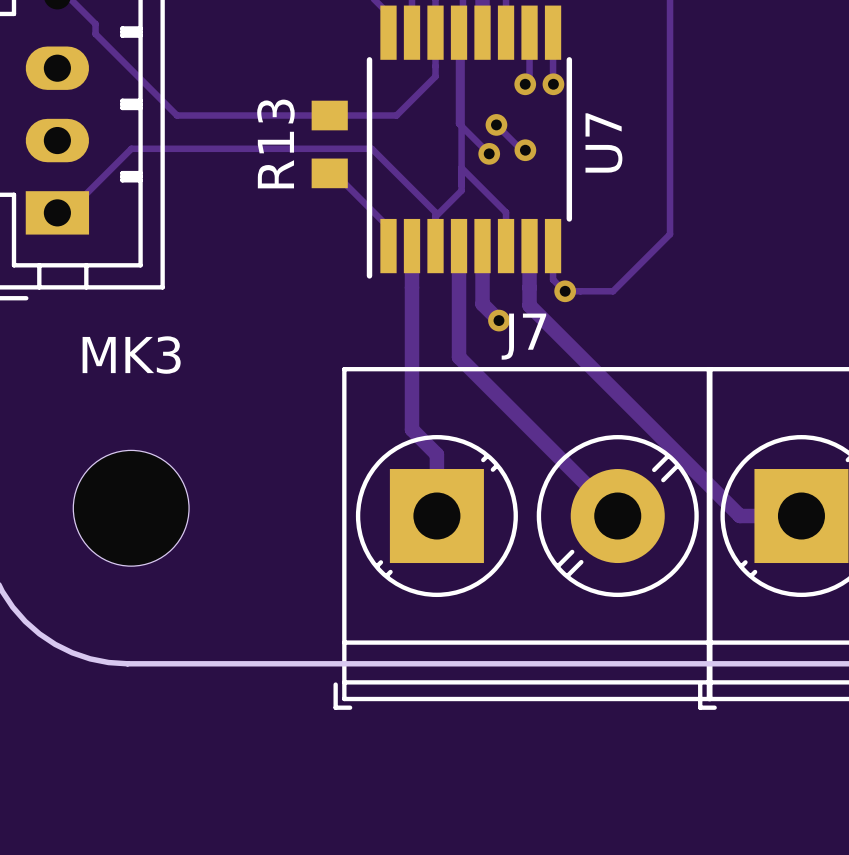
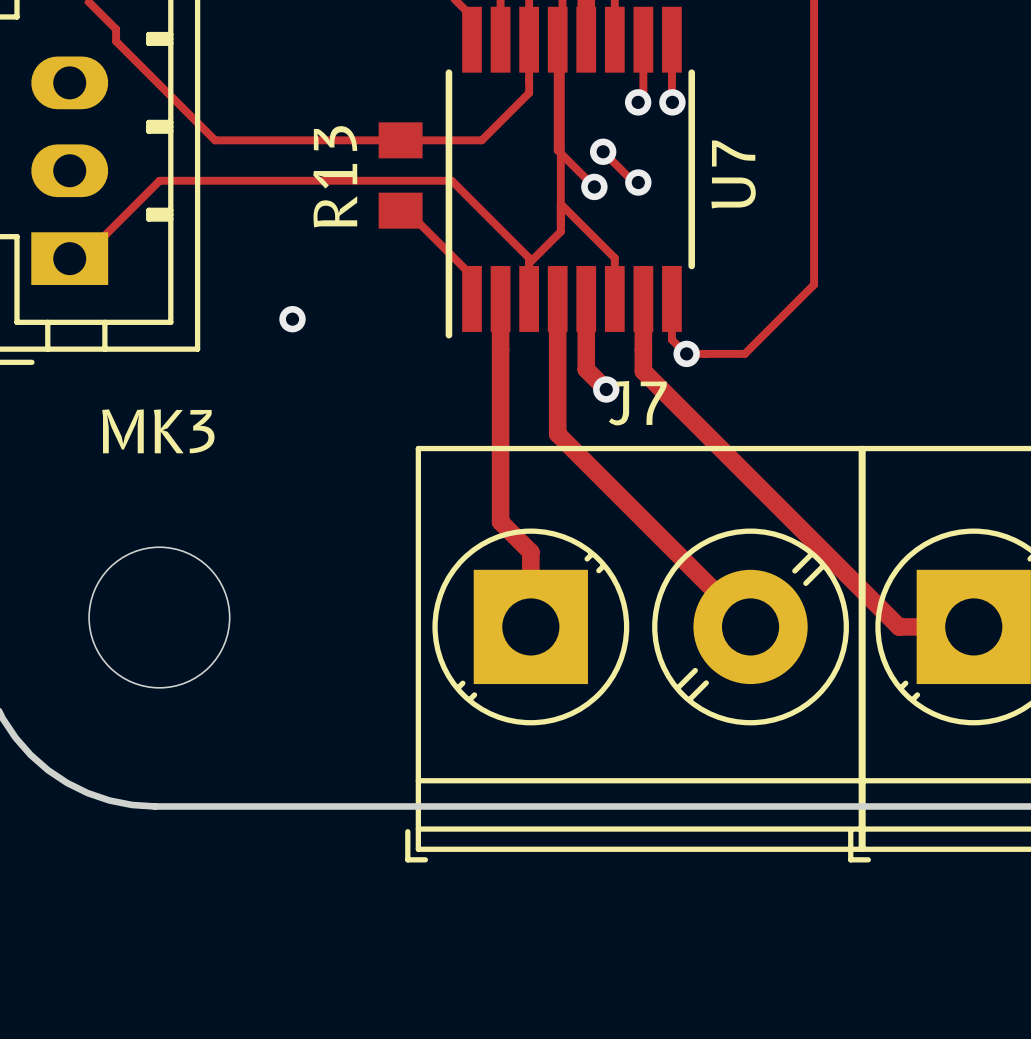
via: none -> (292, 319)

